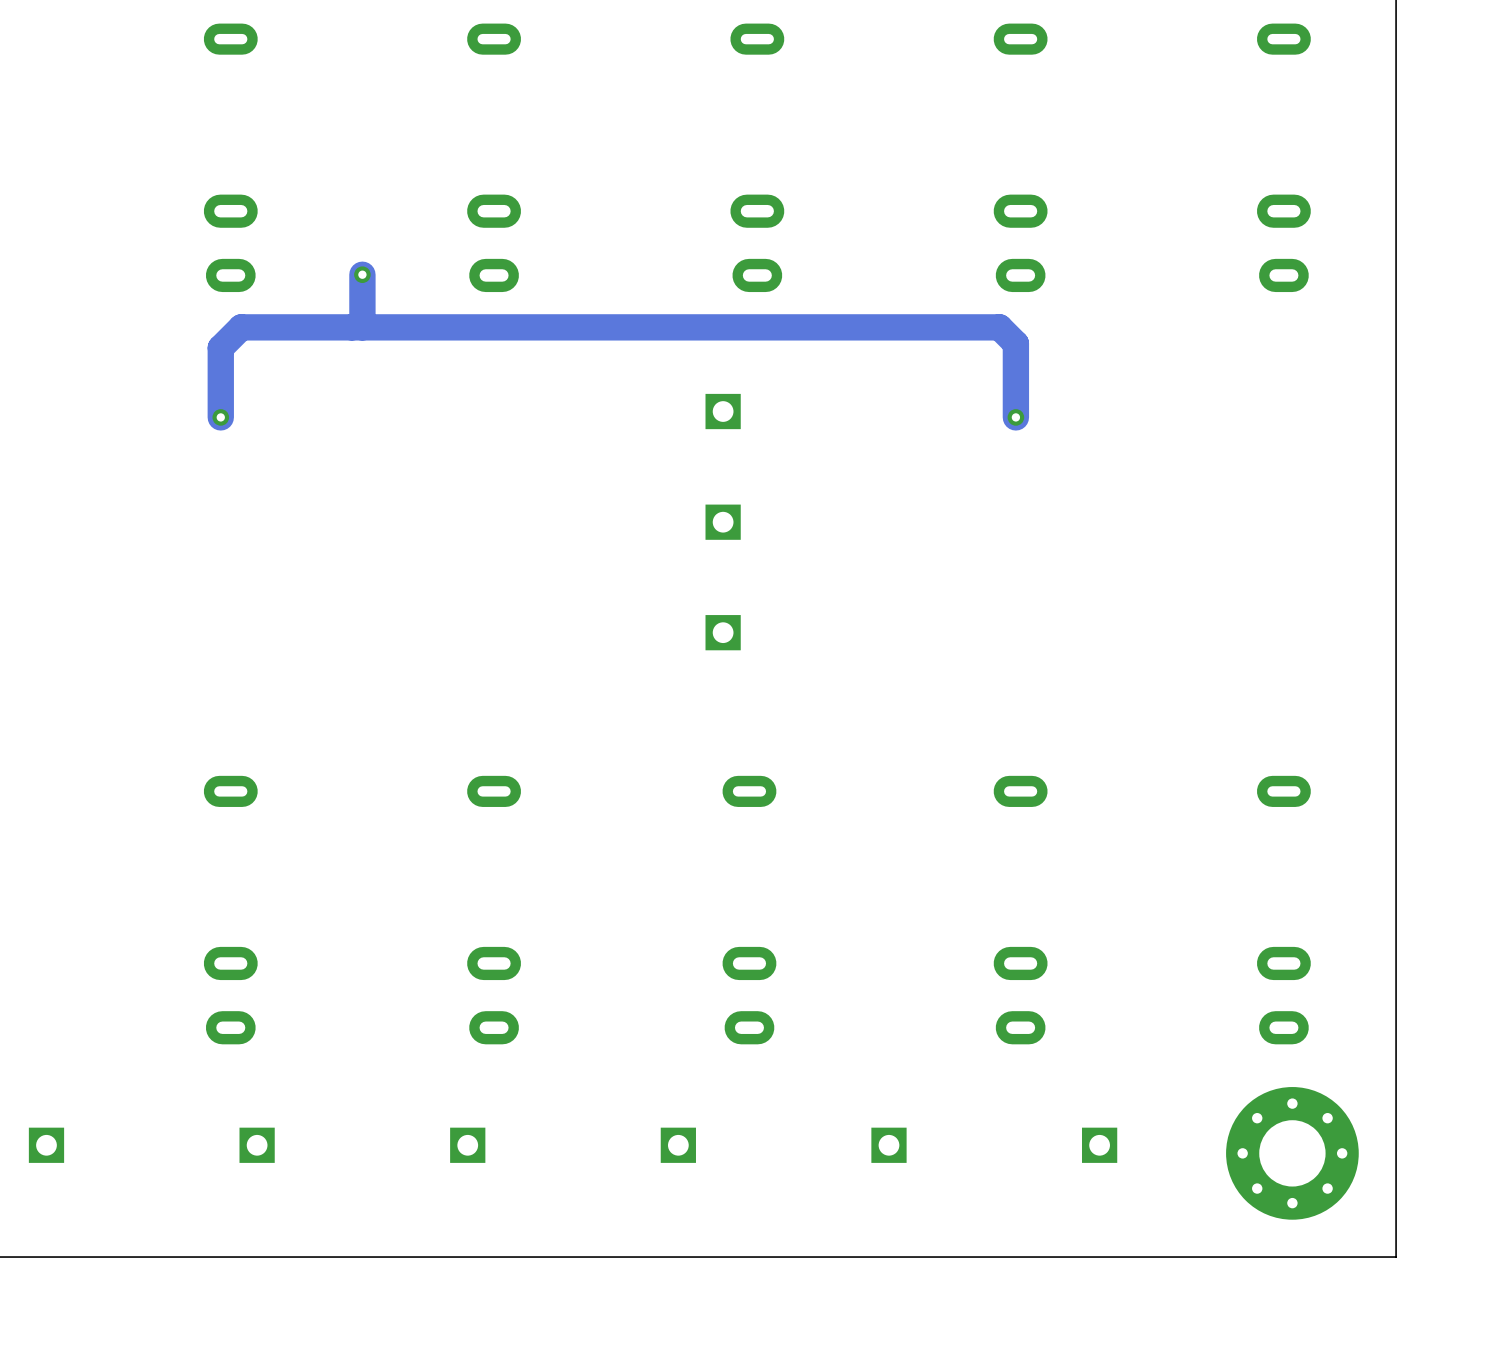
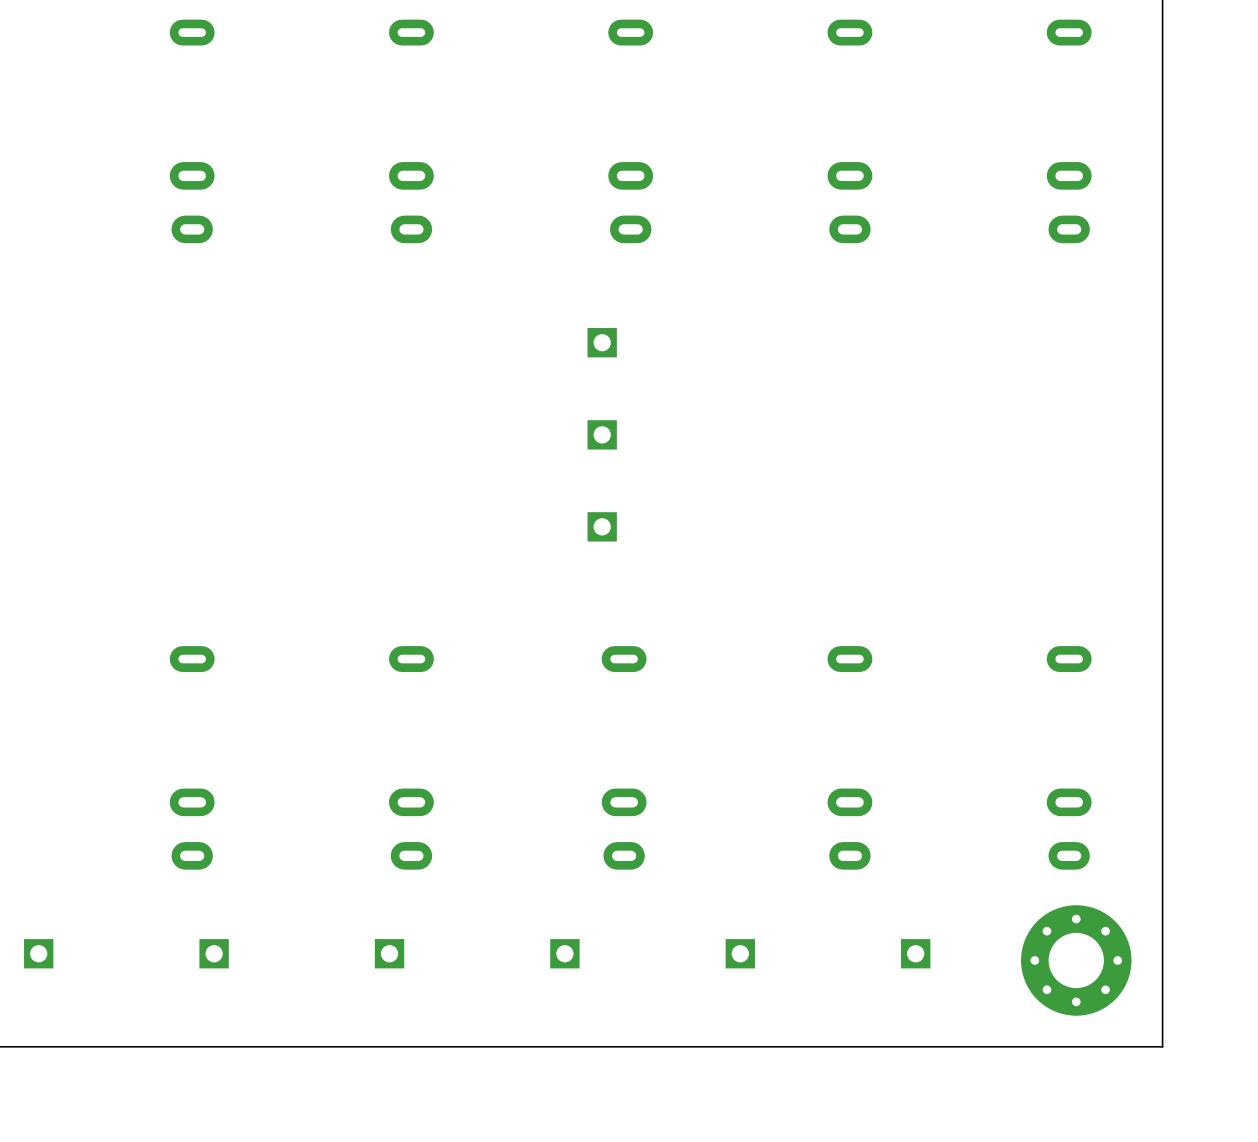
track: (362, 274) (362, 327) -> none
via: (362, 274) -> none
via: (220, 417) -> none
track: (1015, 417) (1015, 343) (999, 327) (241, 327) (220, 347) (220, 417) -> none
via: (1015, 417) -> none

